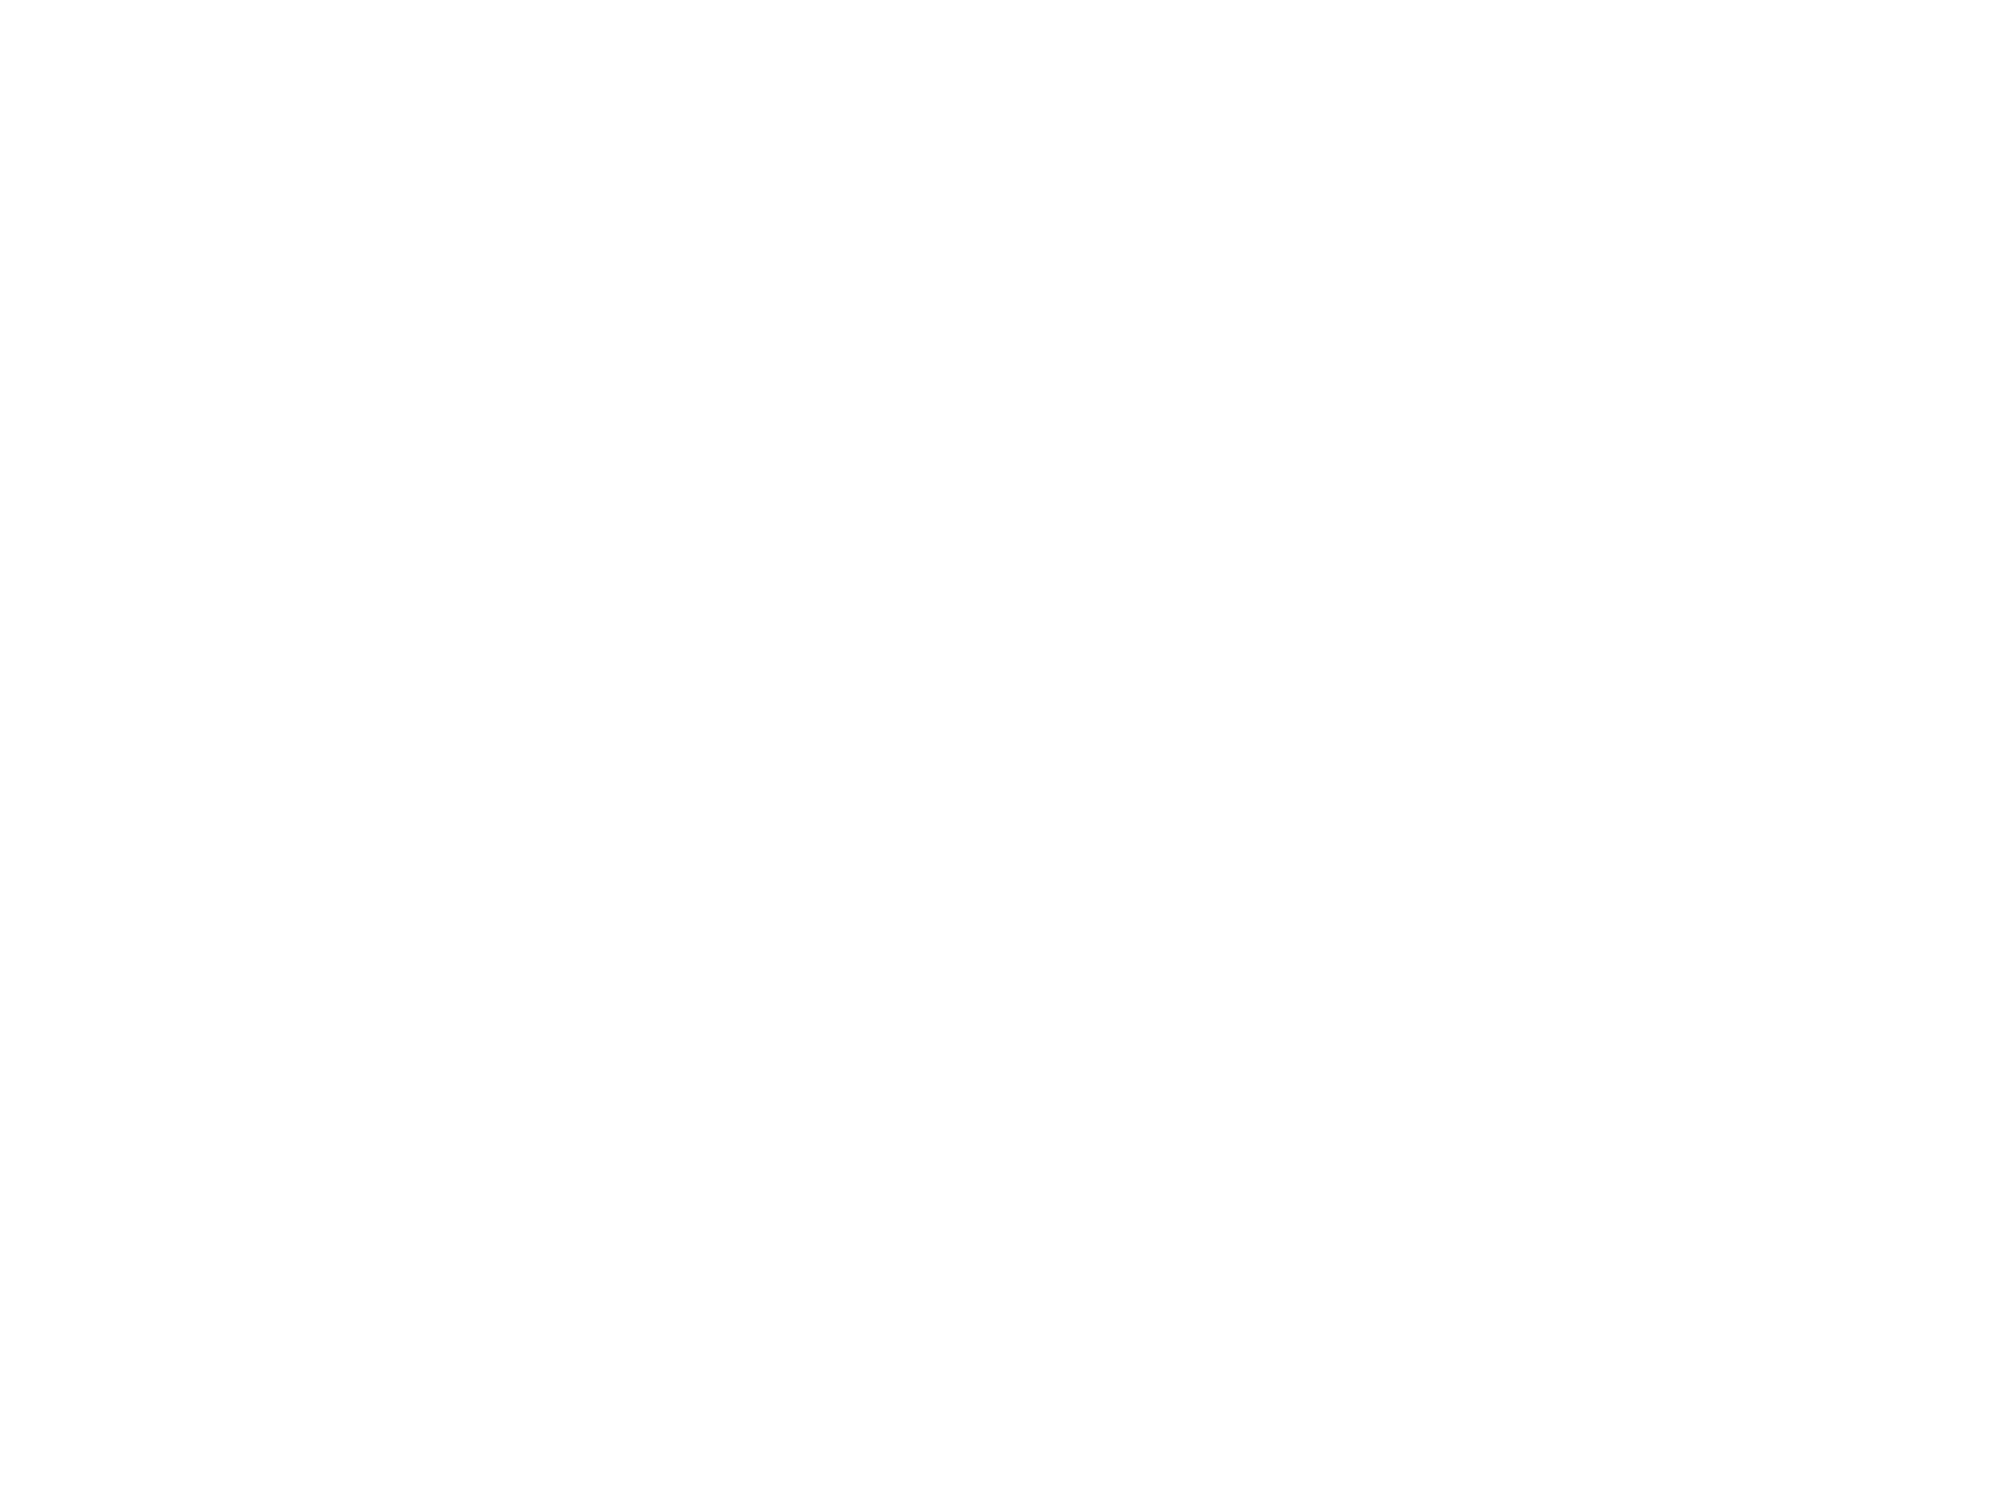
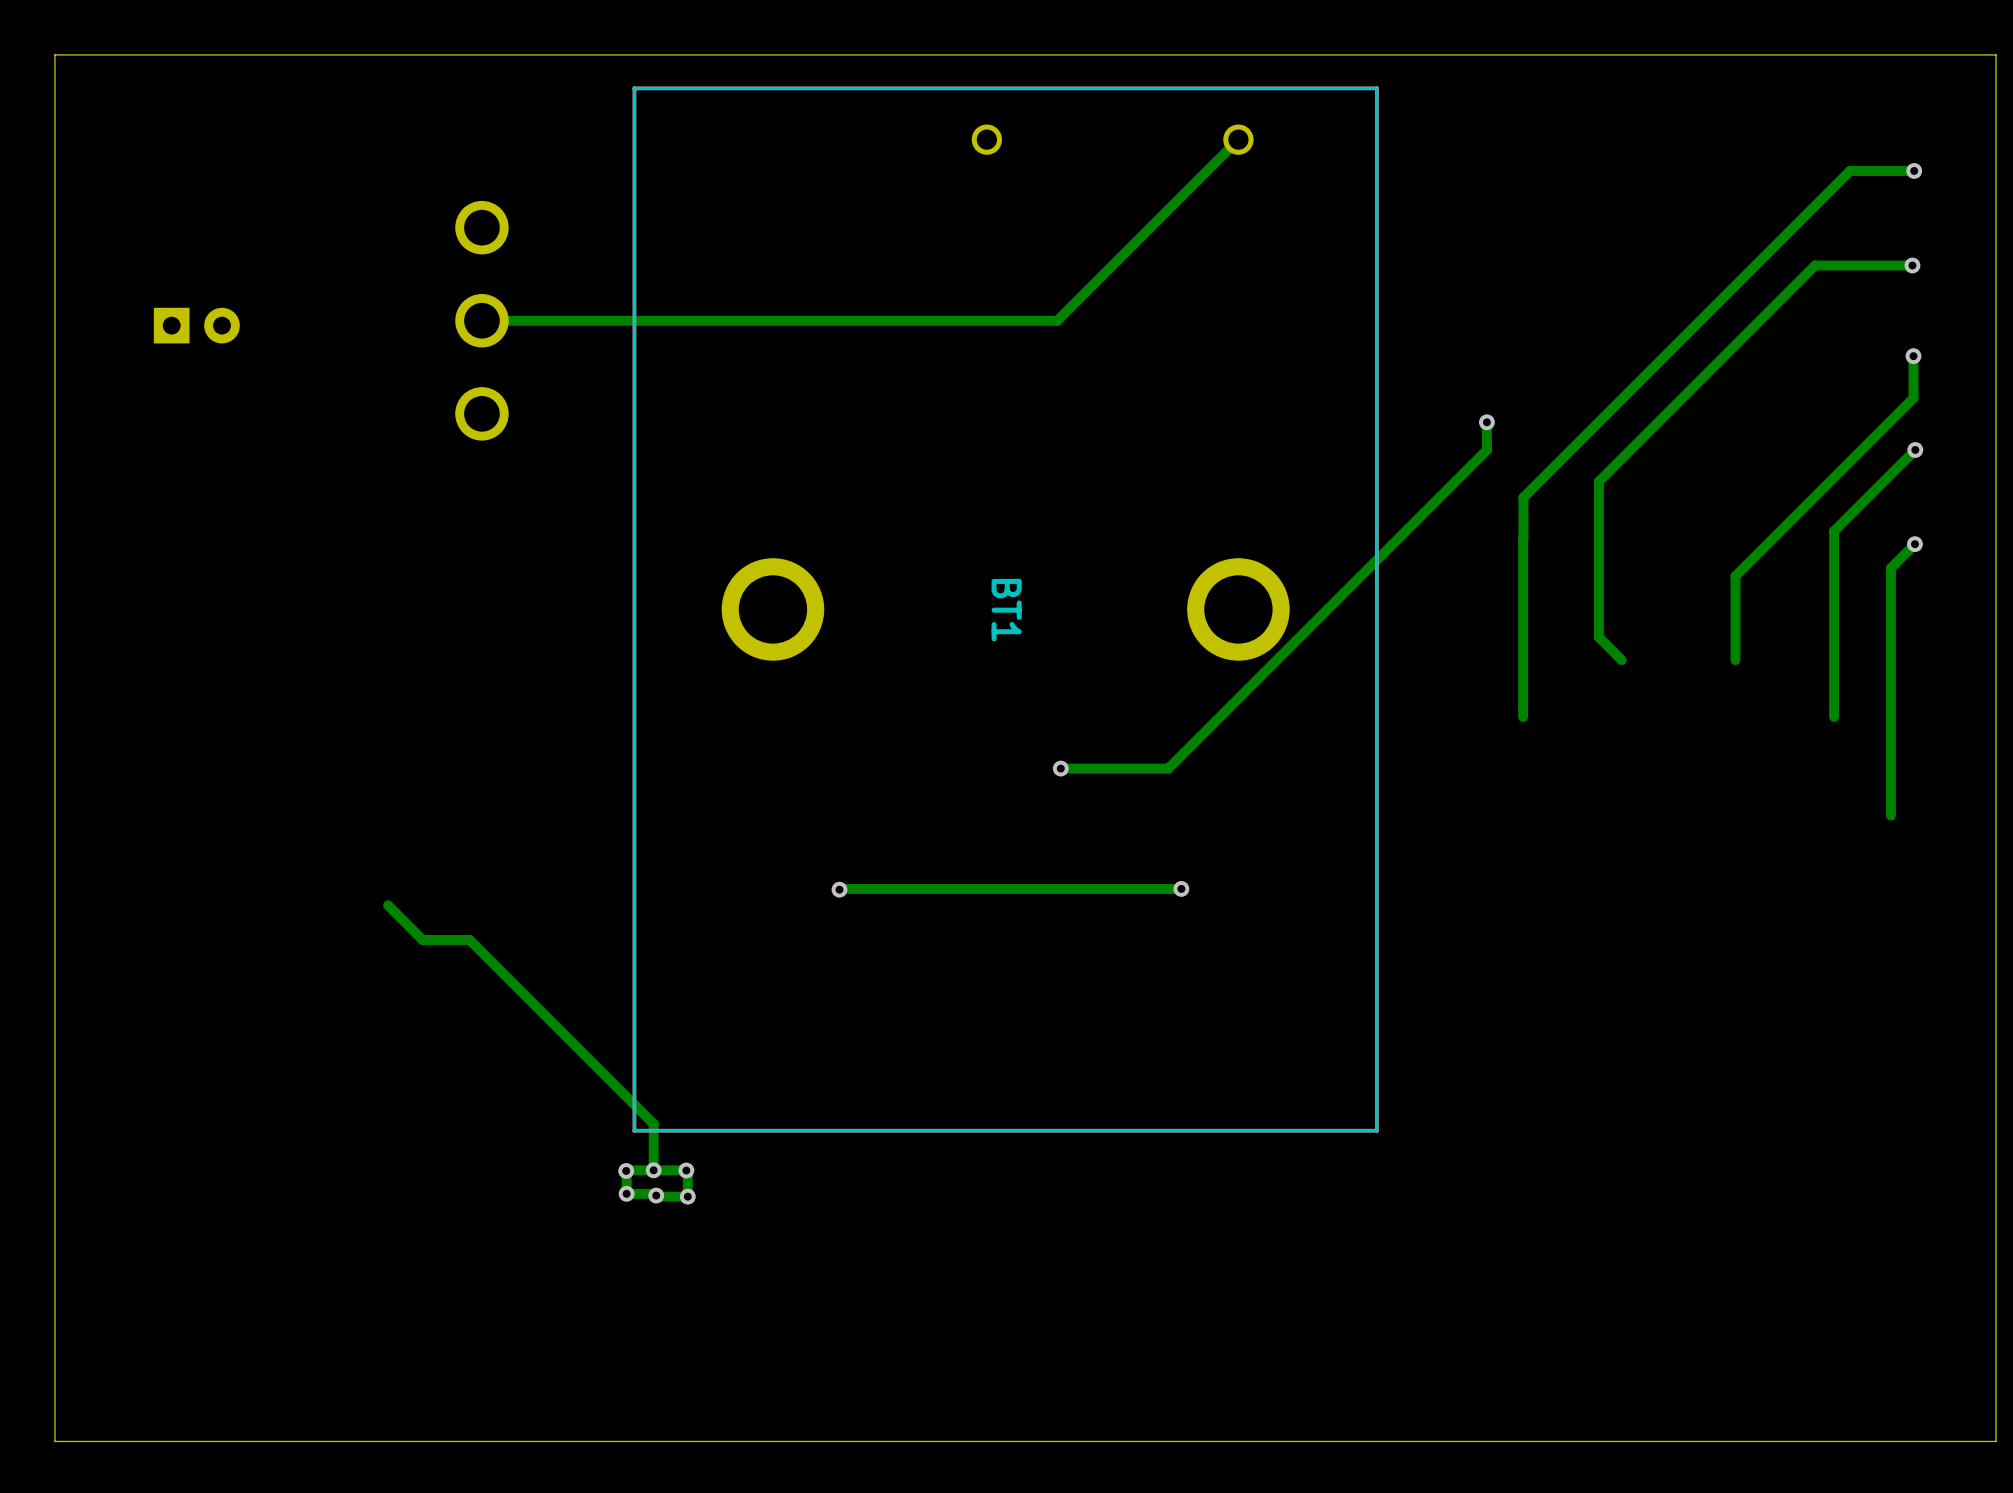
board edge: none -> (1996, 54) (1996, 1441) (54, 1441) (54, 54) (1996, 54)
track: none -> (1238, 139) (1057, 320) (481, 320)
track: none -> (1914, 170) (1850, 170) (1523, 497) (1523, 717)
via: none -> (1914, 170)
track: none -> (1912, 265) (1814, 265) (1598, 481) (1598, 637) (1621, 660)
via: none -> (1912, 265)
part: none -> (481, 320)
part: none -> (196, 325)
track: none -> (1913, 356) (1913, 398) (1735, 576) (1735, 660)
via: none -> (1913, 356)
track: none -> (1486, 422) (1486, 450) (1168, 768) (1060, 768)
via: none -> (1486, 422)
track: none -> (1915, 449) (1834, 531) (1834, 717)
via: none -> (1915, 449)
track: none -> (1914, 544) (1890, 568) (1890, 815)
via: none -> (1914, 544)
BT1: none -> (1005, 609)
via: none -> (1060, 768)
track: none -> (1181, 888) (839, 889)
via: none -> (1181, 888)
via: none -> (839, 889)
track: none -> (388, 905) (422, 939) (469, 939) (653, 1123) (653, 1170)
via: none -> (626, 1170)
via: none -> (653, 1170)
track: none -> (686, 1170) (687, 1171) (687, 1196) (626, 1193) (626, 1170) (686, 1170)
via: none -> (686, 1170)
via: none -> (626, 1193)
via: none -> (656, 1195)
via: none -> (687, 1196)

